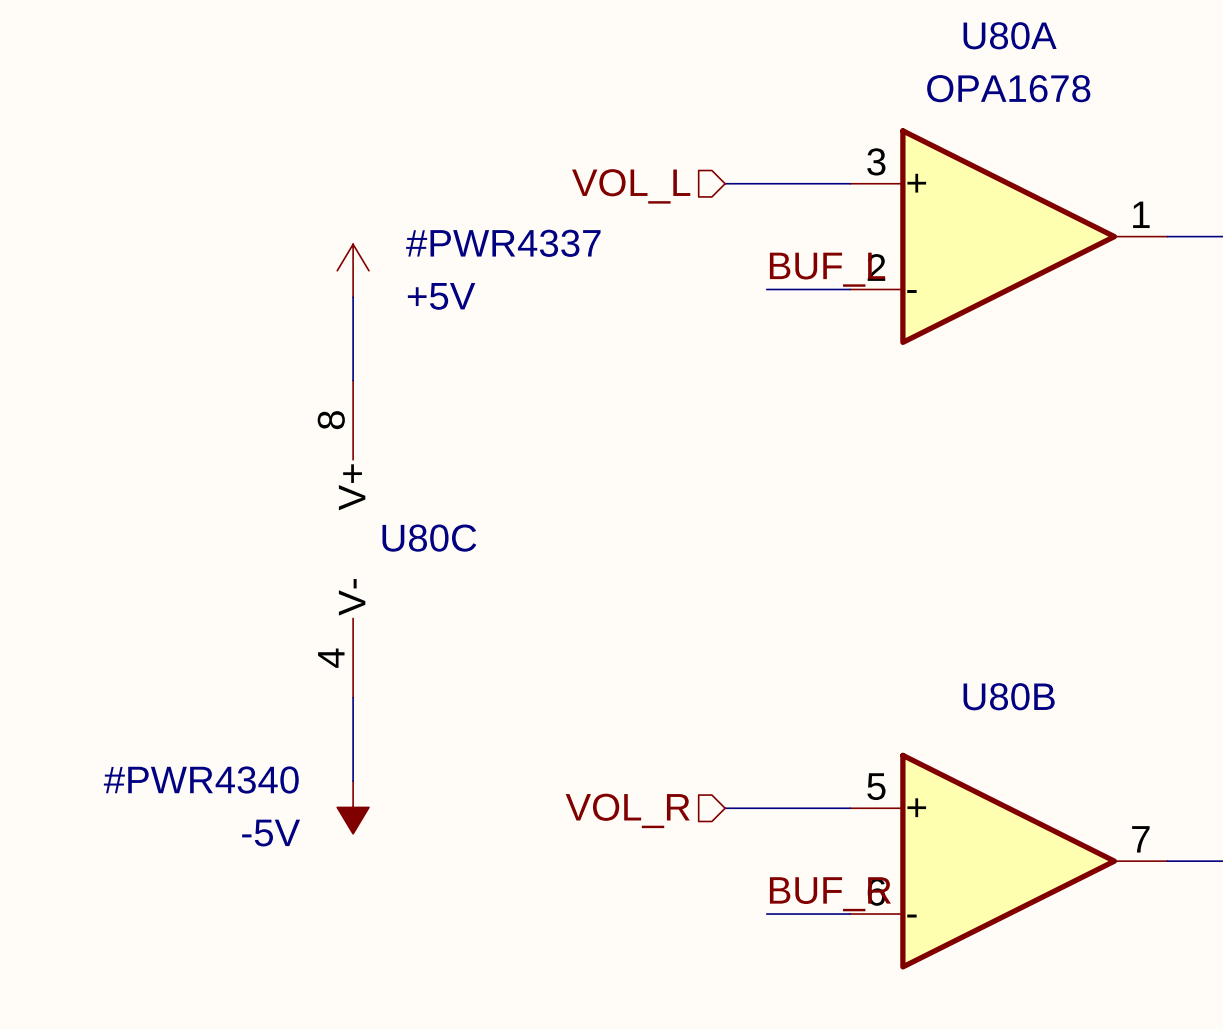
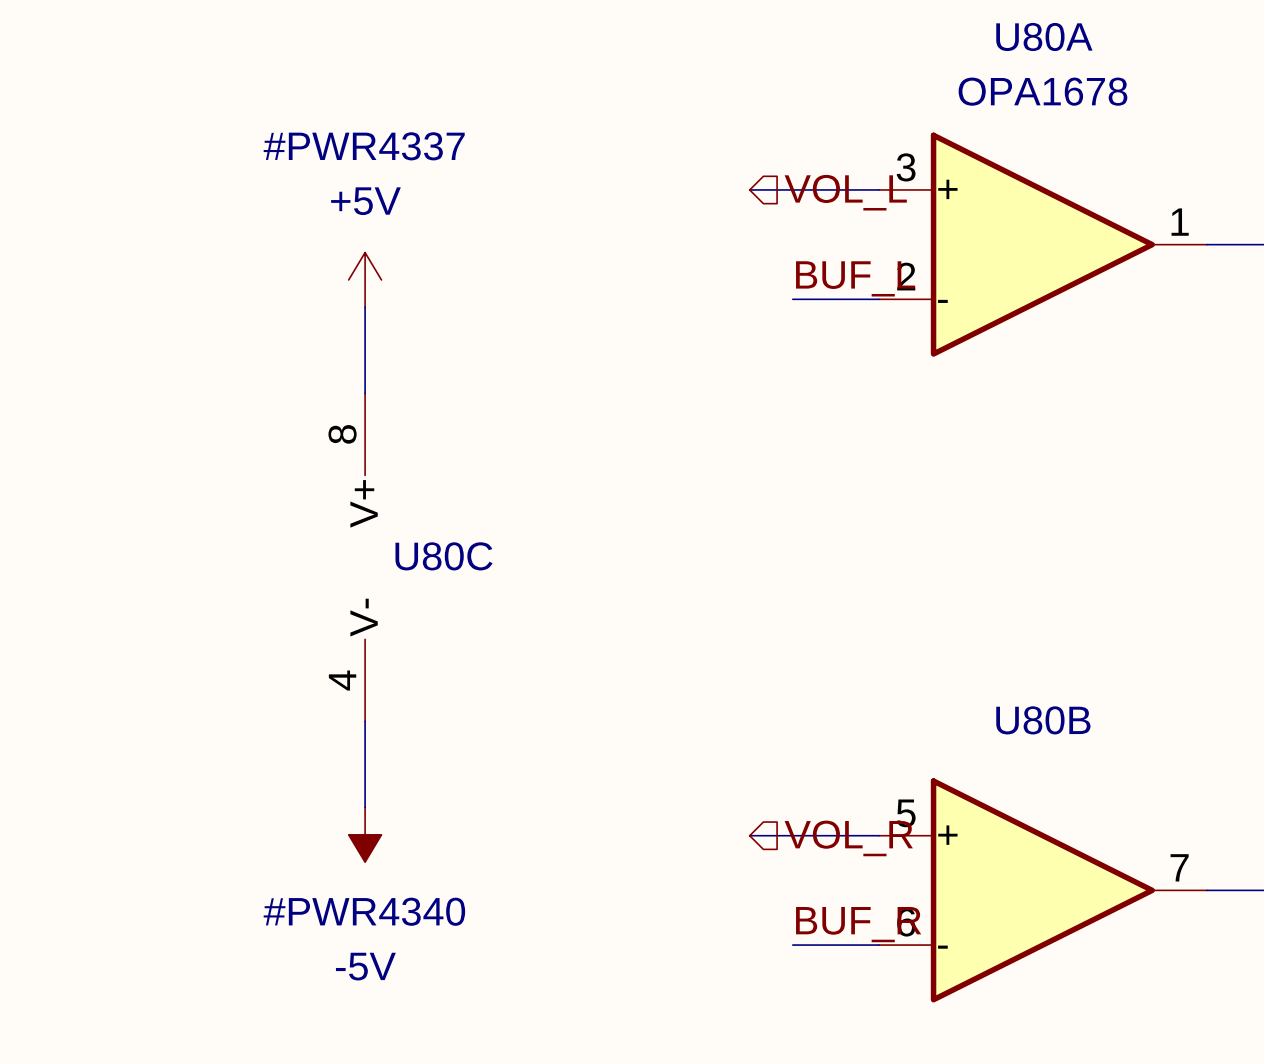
hierarchical label rotation: 0° (631, 186) -> 180° (845, 192)
hierarchical label position: VOL_L (631, 186) -> VOL_L (845, 192)
#PWR4337 name position: #PWR4337 (503, 243) -> #PWR4337 (364, 146)
#PWR4337 text position: +5V (441, 296) -> +5V (365, 201)
#PWR4340 name position: #PWR4340 (201, 779) -> #PWR4340 (364, 911)
hierarchical label rotation: 0° (627, 810) -> 180° (848, 838)
hierarchical label position: VOL_R (627, 810) -> VOL_R (848, 838)
#PWR4340 text position: -5V (271, 833) -> -5V (365, 966)

